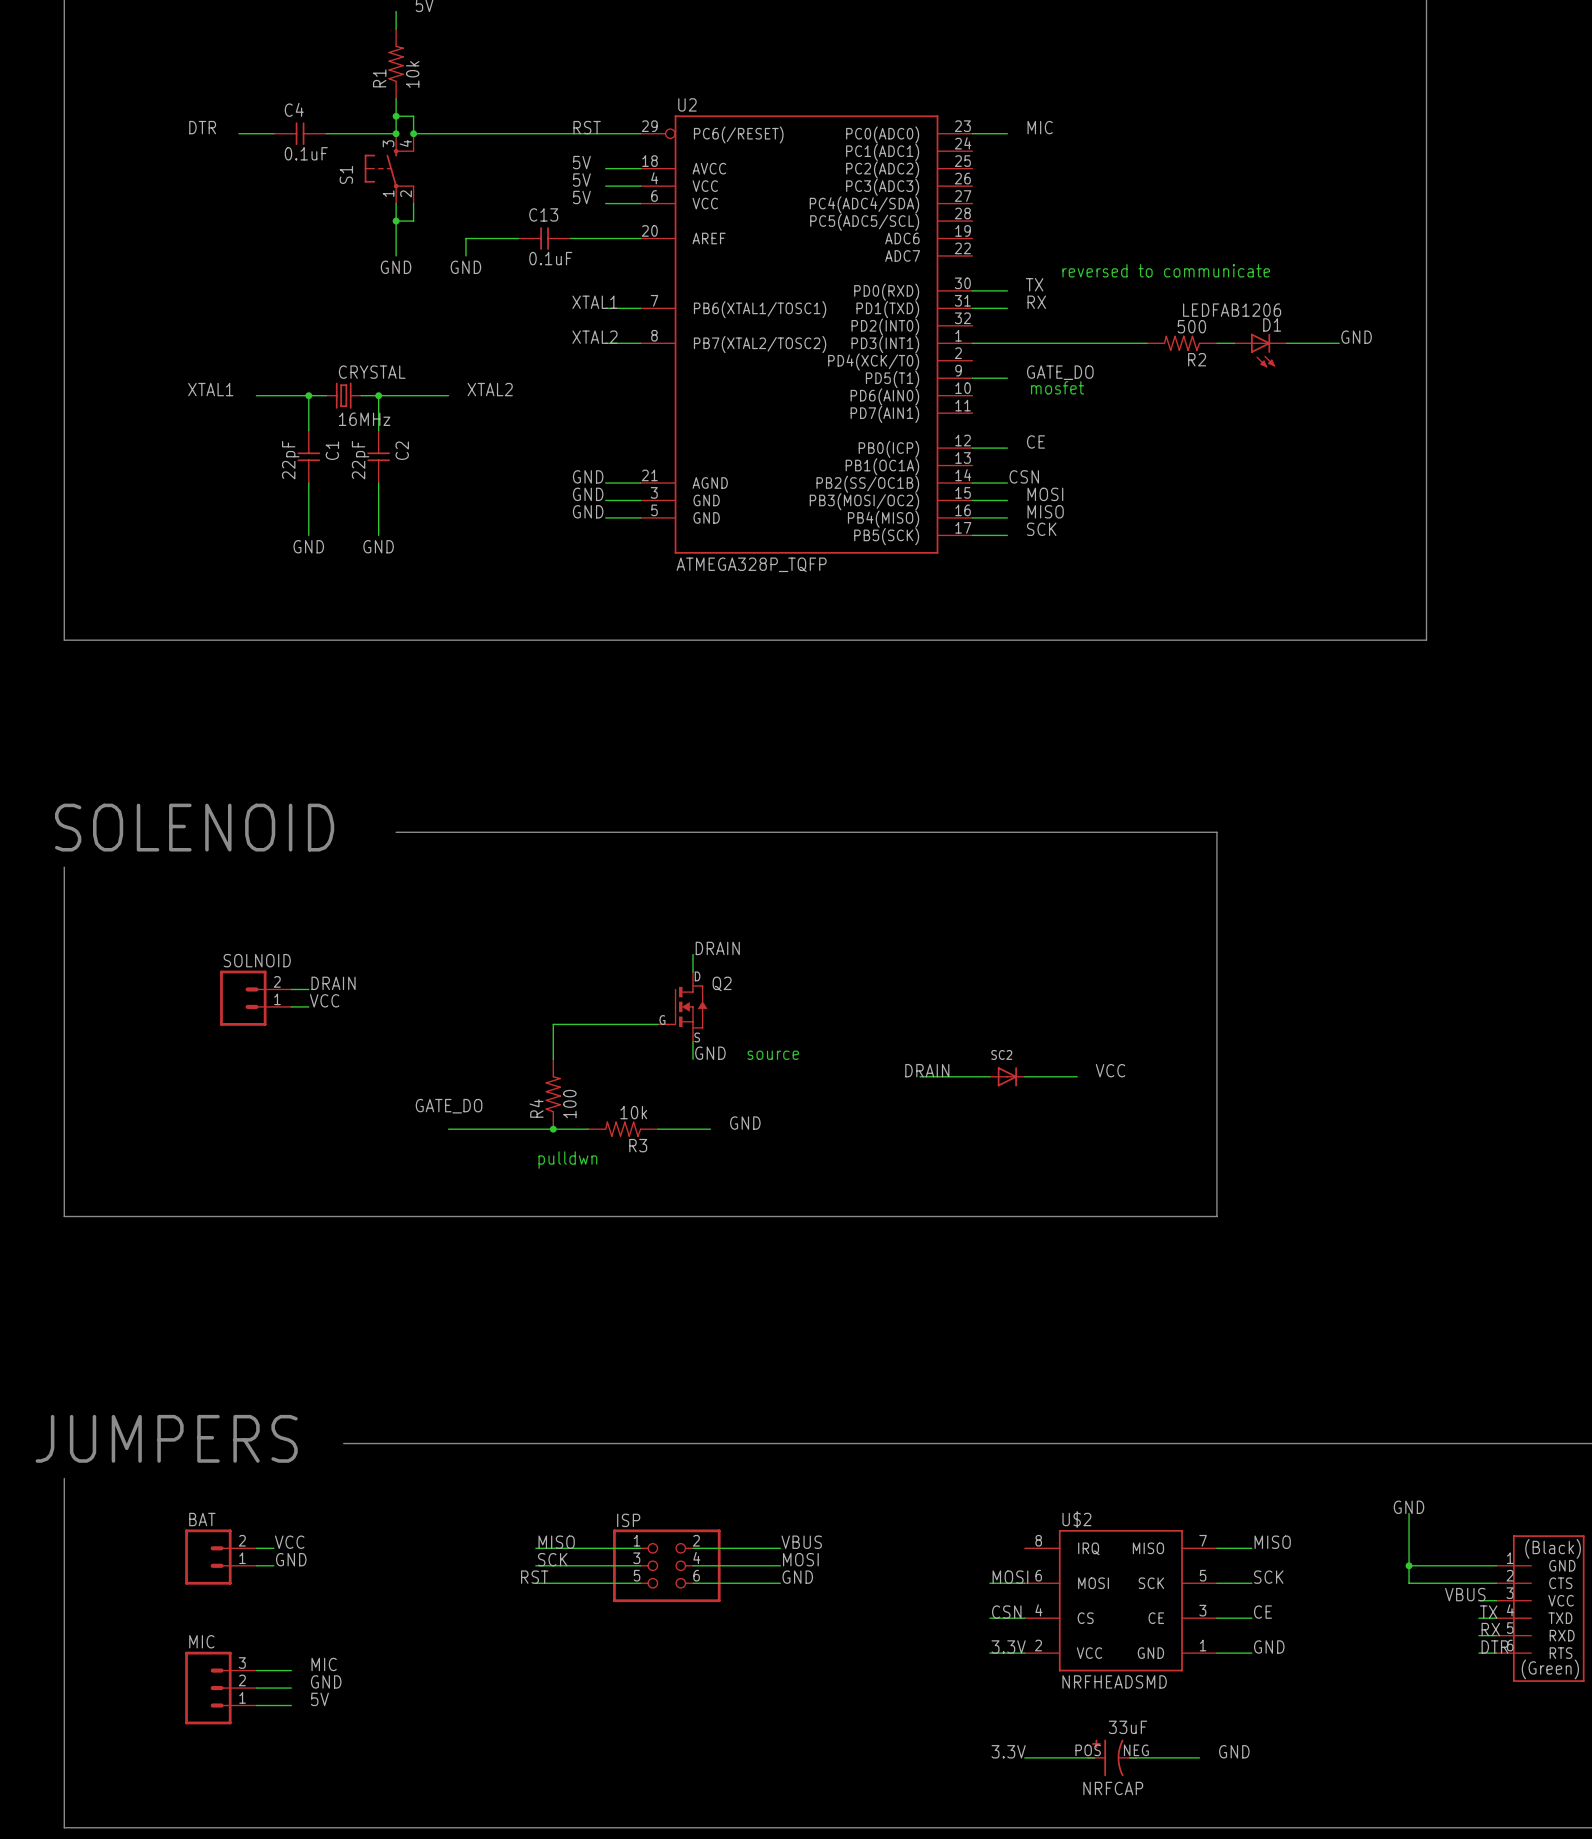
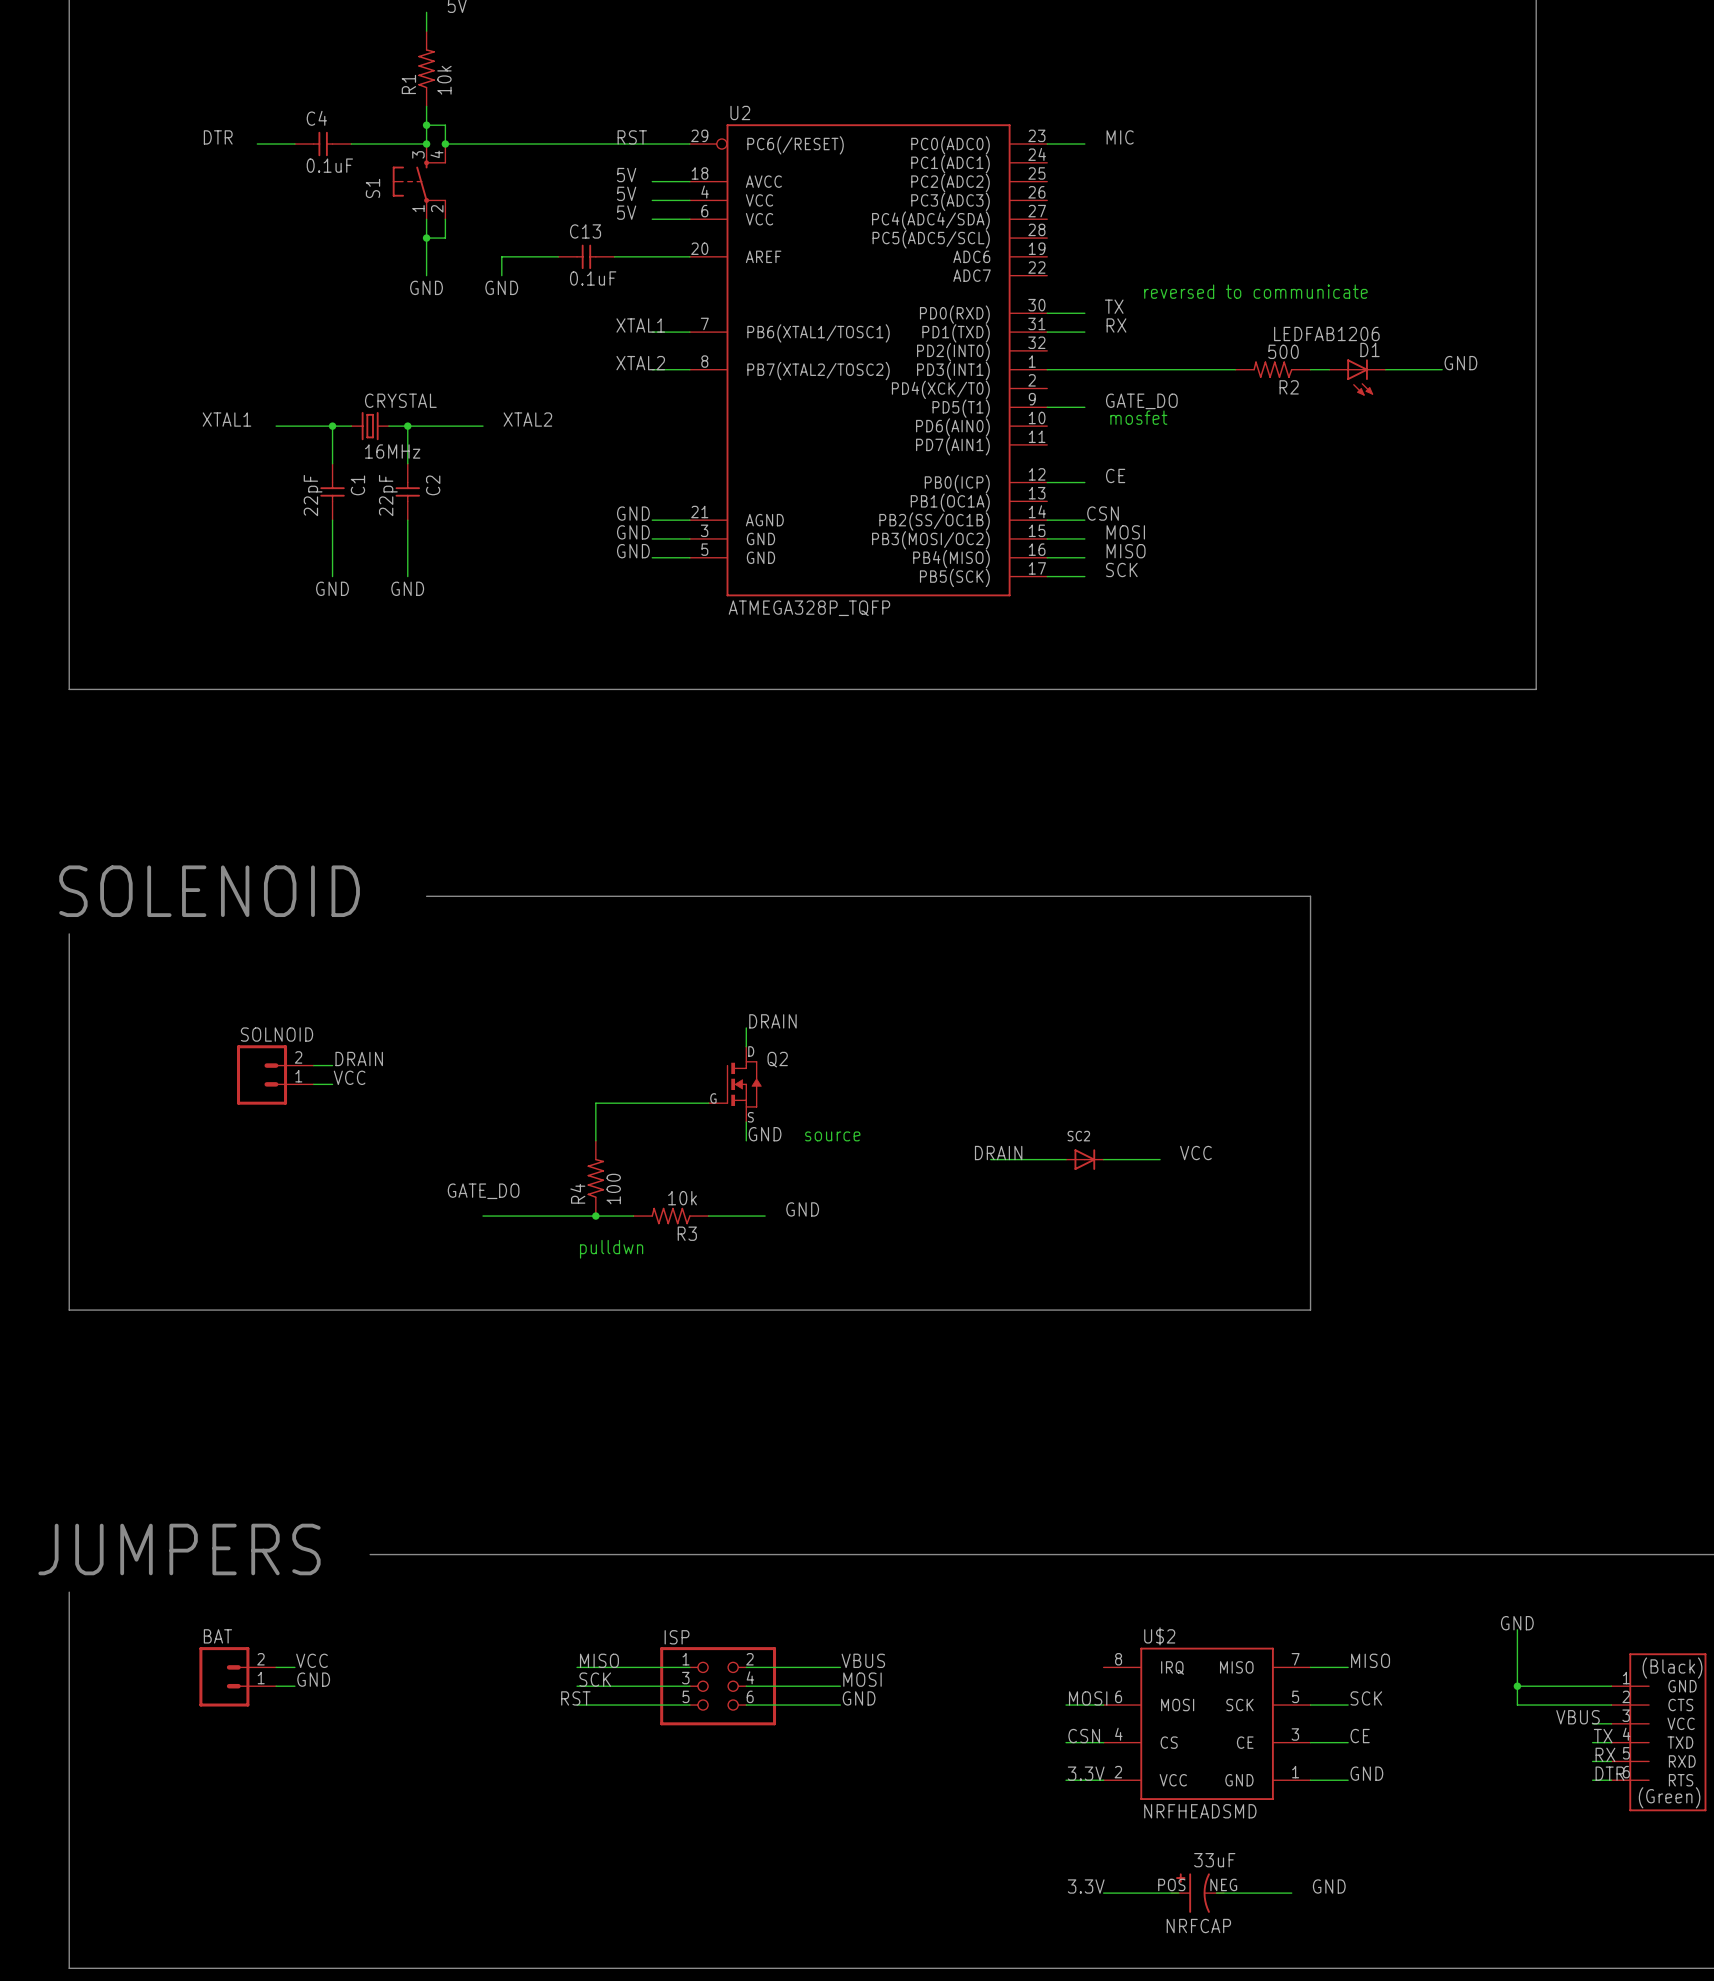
label: MIC (324, 1664) -> none
wire: (256, 1670) (291, 1670) -> none
label: GND (326, 1681) -> none
MIC: (220, 1688) -> none
wire: (256, 1688) (291, 1688) -> none
label: 5V (319, 1699) -> none
wire: (256, 1705) (291, 1705) -> none

